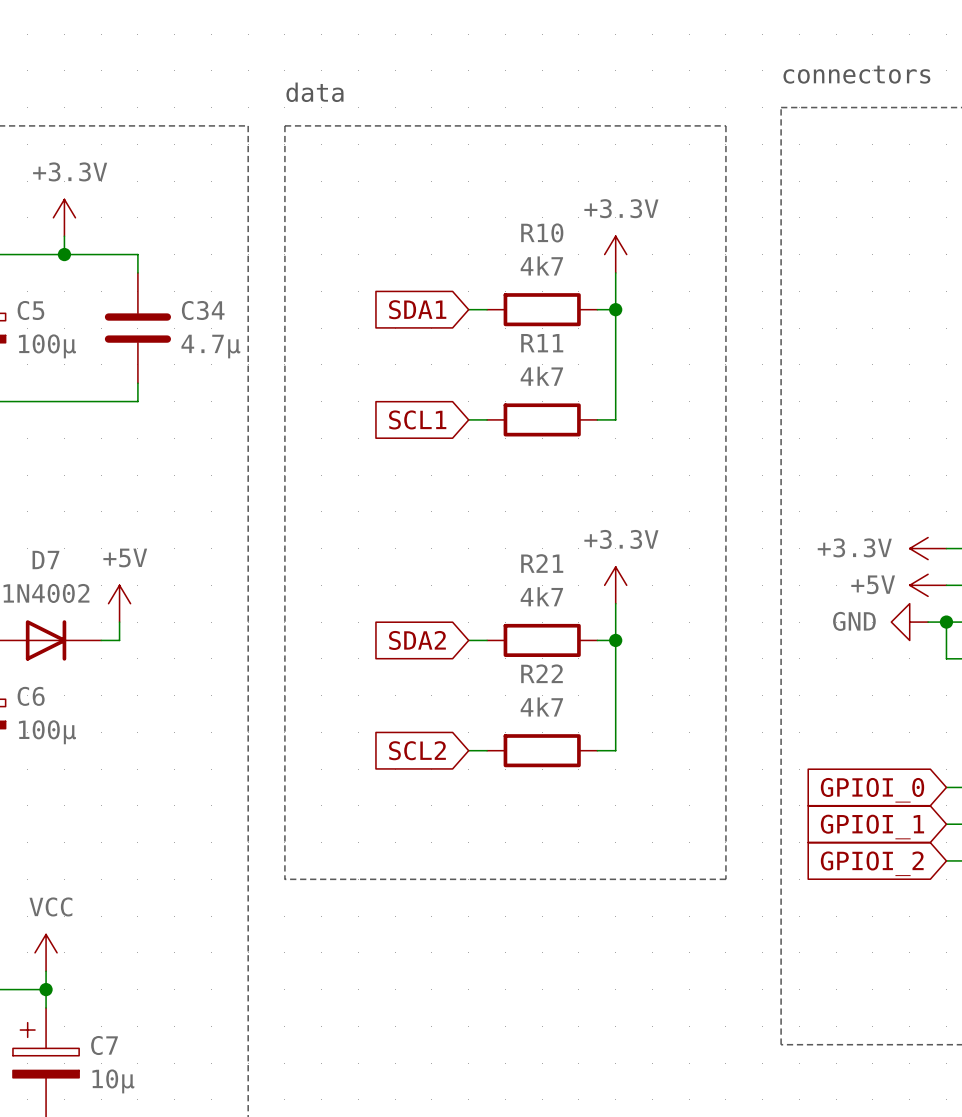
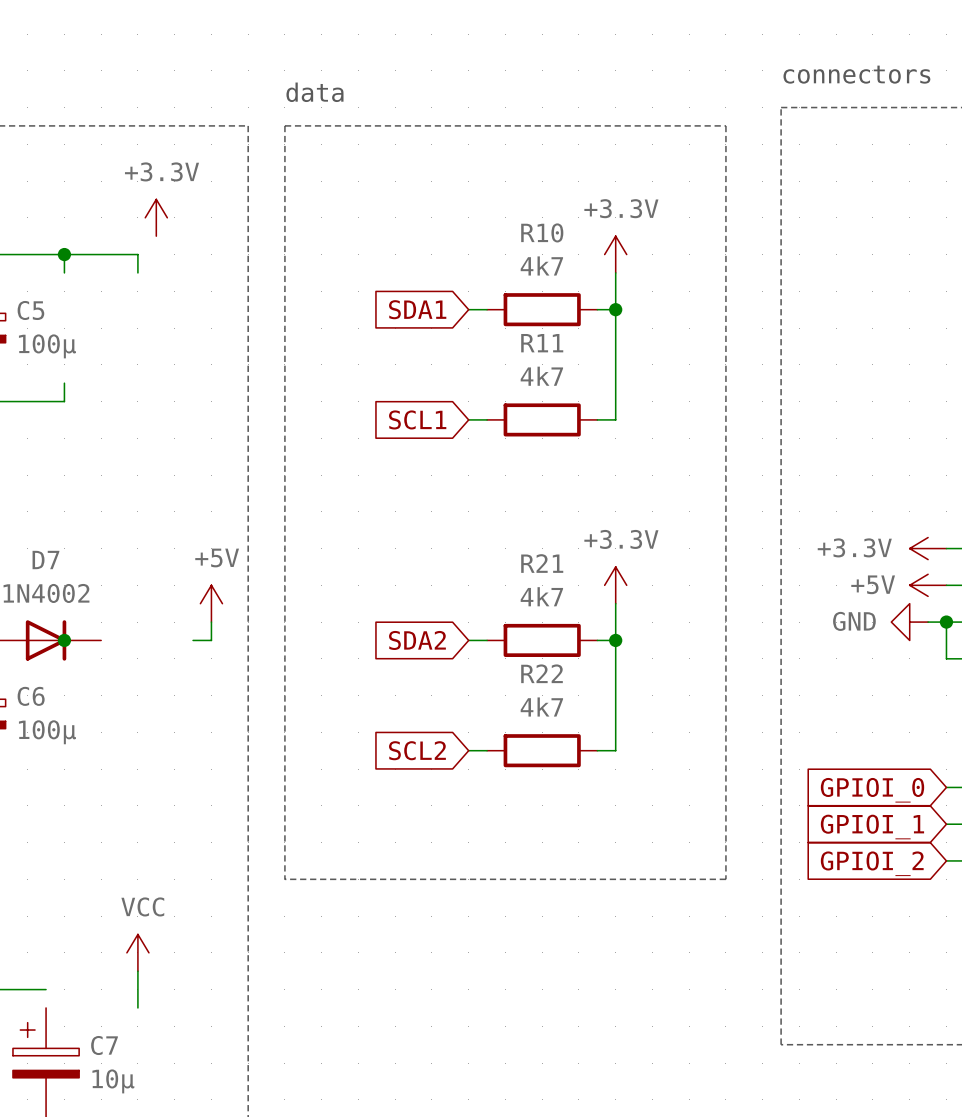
power symbol position: +3.3V (64, 217) -> +3.3V (156, 217)
wire: (64, 236) (64, 254) -> (64, 272) (64, 254)
C34: 4.7µ (137, 328) -> none
wire: (137, 383) (137, 401) (64, 401) -> (64, 383) (64, 401)
power symbol position: +5V (119, 603) -> +5V (211, 603)
wire: (119, 622) (119, 640) (101, 640) -> (211, 622) (211, 640) (193, 640)
junction: none -> (64, 640)
power symbol position: VCC (46, 952) -> VCC (137, 952)
wire: (46, 971) (46, 1007) -> (137, 971) (137, 1007)
junction: (46, 989) -> none

